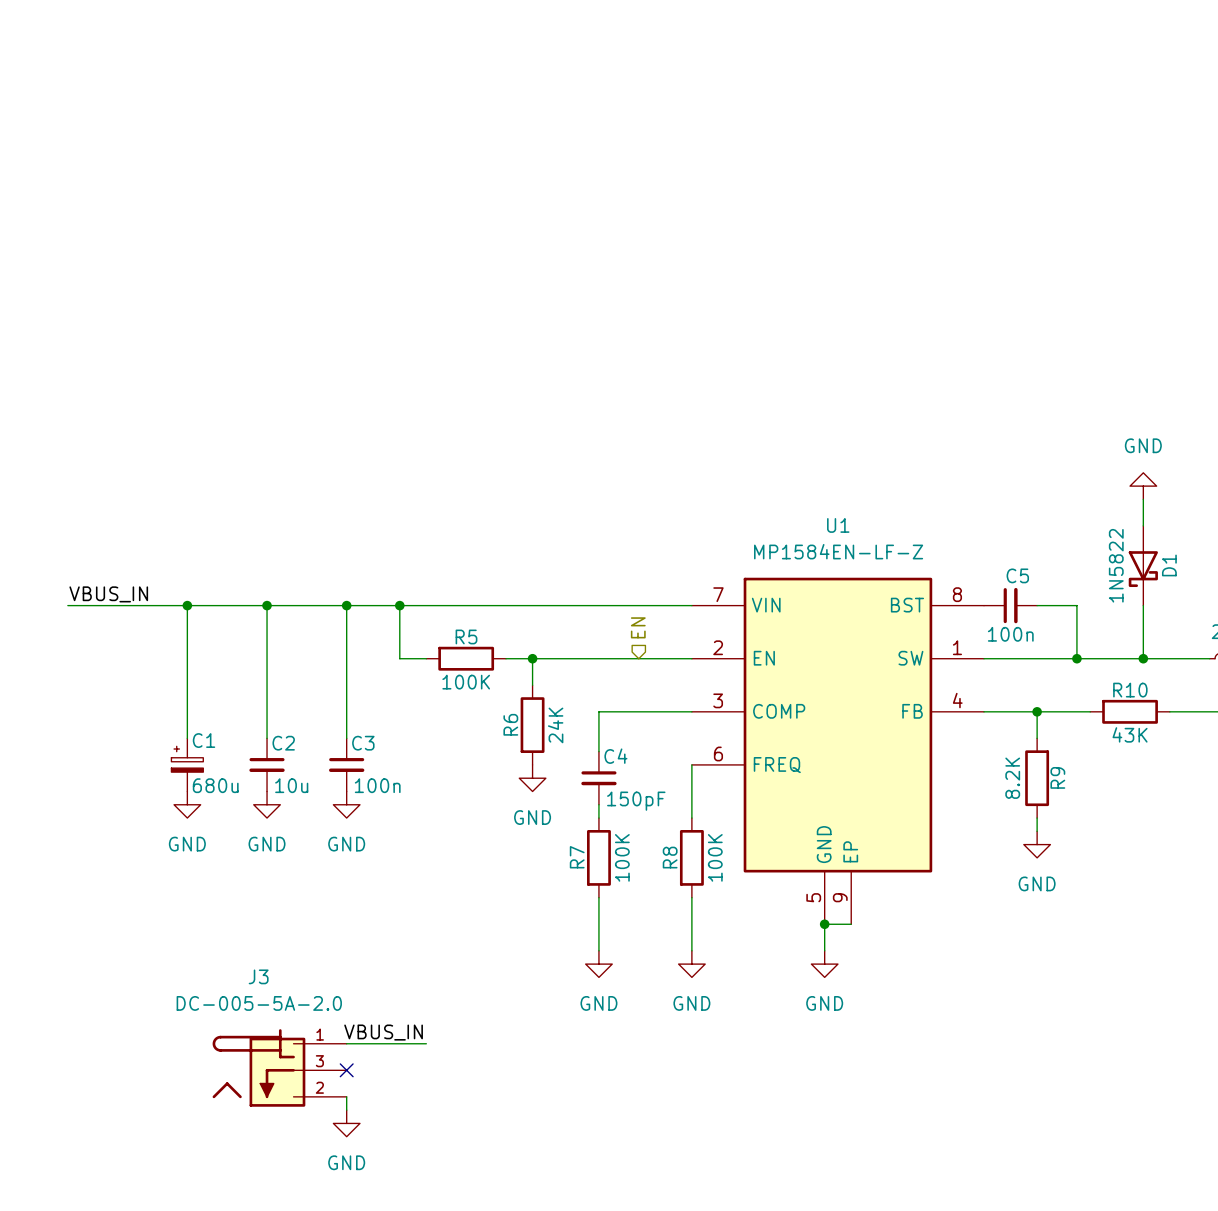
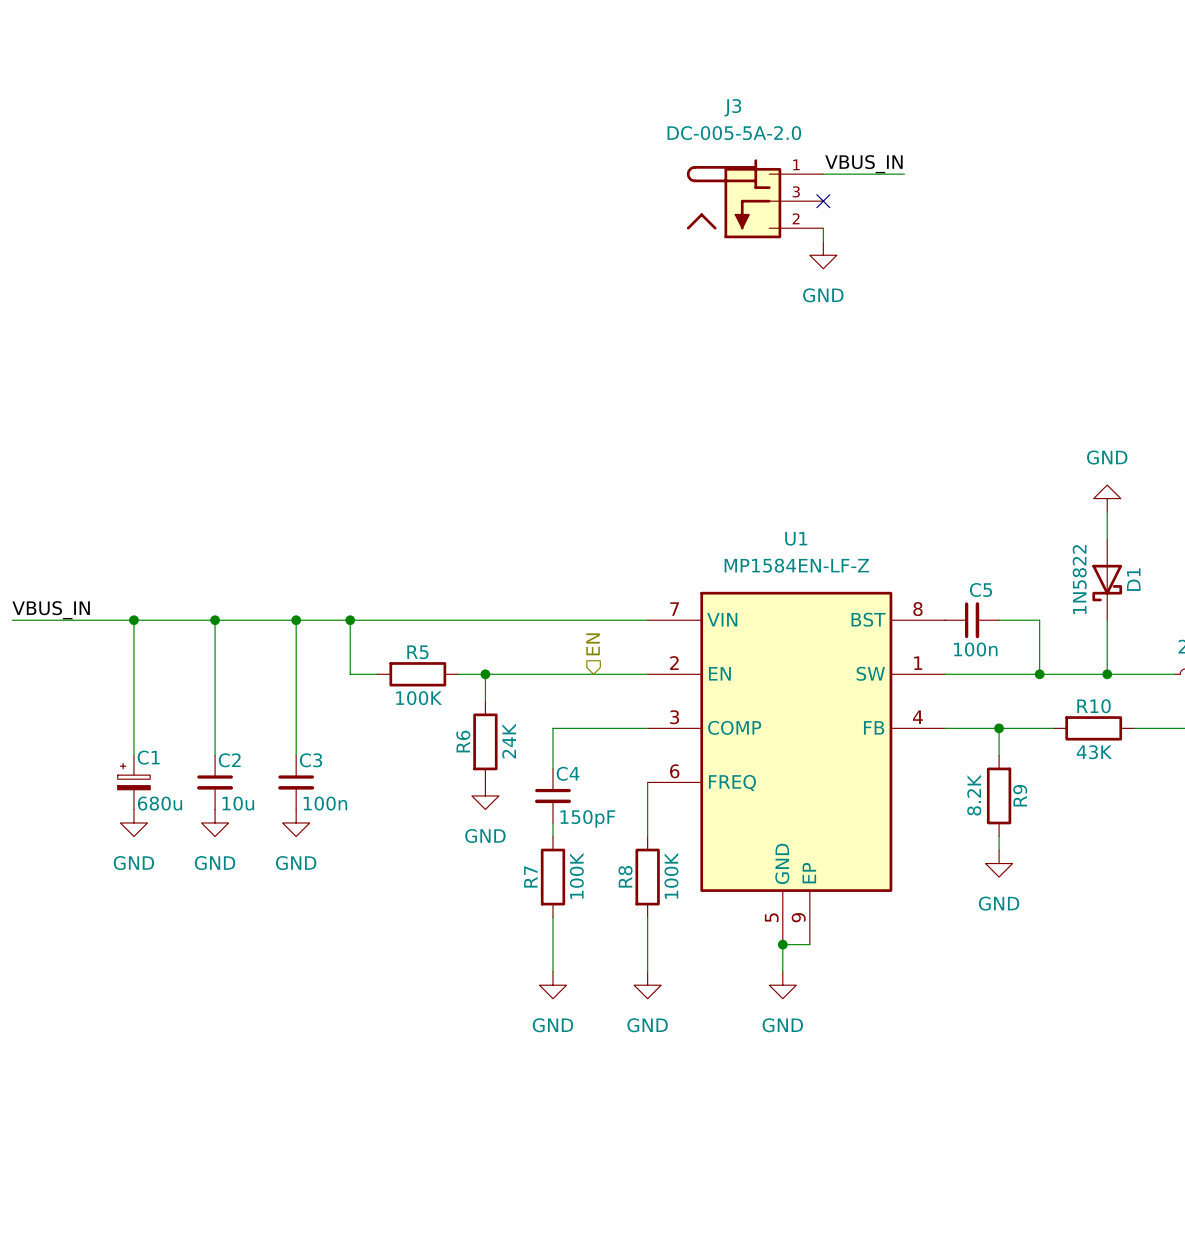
label: none -> VBUS_IN (863, 164)
wire: none -> (823, 174) (904, 174)
no-connect mark: none -> (823, 201)
wire: none -> (823, 228) (823, 241)
power symbol: none -> GND (823, 255)
label: VBUS_IN (383, 1032) -> none
wire: (346, 1043) (426, 1043) -> none
J3 position: (279, 1067) -> (755, 198)
no-connect mark: (346, 1070) -> none
wire: (346, 1096) (346, 1110) -> none
power symbol: GND (346, 1123) -> none

